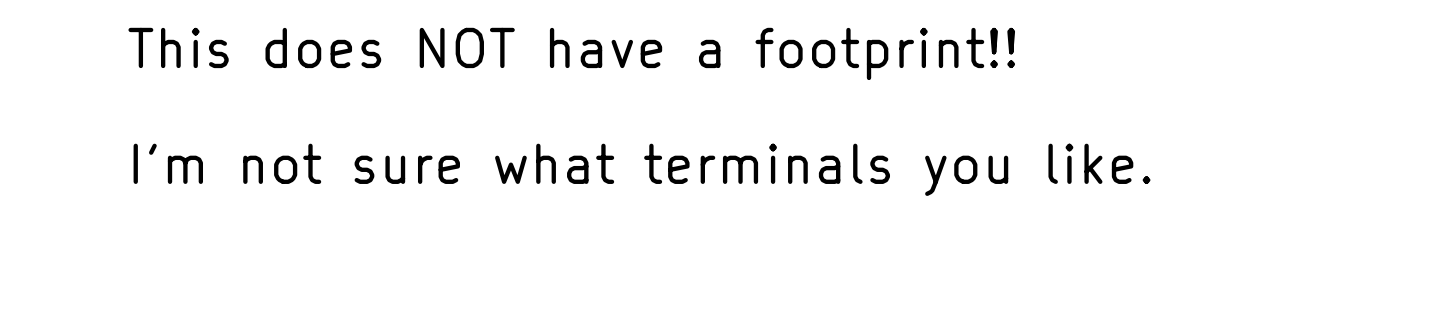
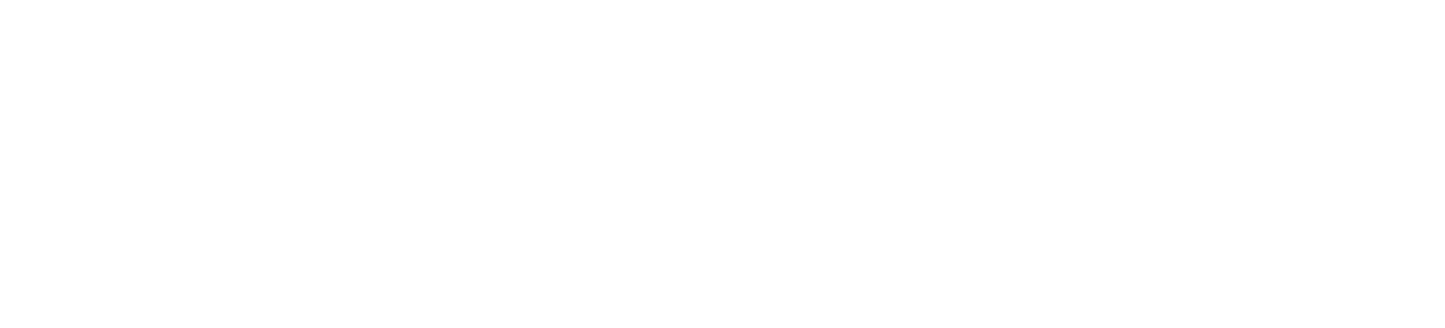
text: This does NOT have a footprint!! (571, 53) -> none
text: I'm not sure what terminals you like. (642, 169) -> none

